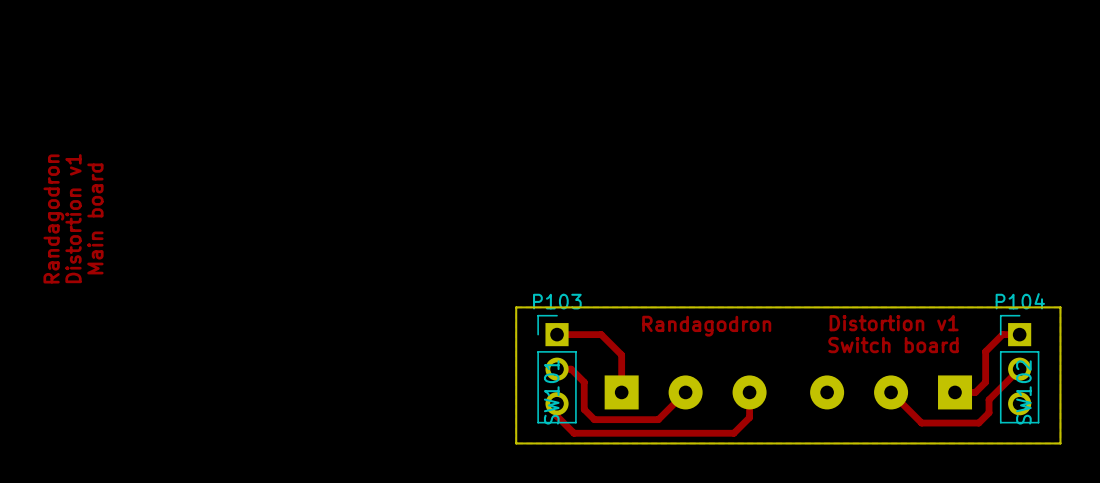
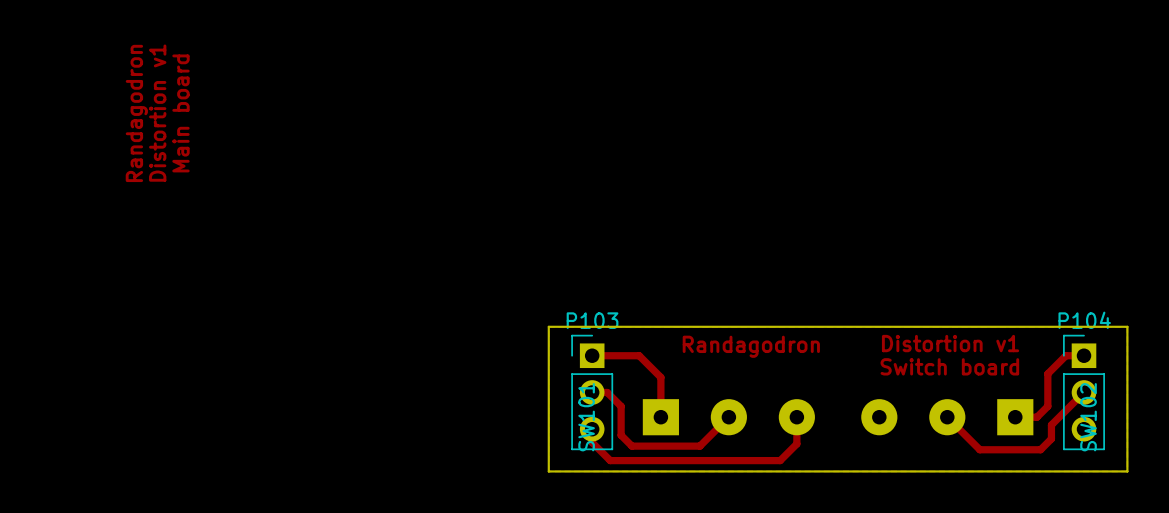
text position: Randagodron (53, 218) -> Randagodron (136, 113)
text position: Distortion v1 (73, 218) -> Distortion v1 (157, 113)
text position: Main board (95, 218) -> Main board (180, 113)

